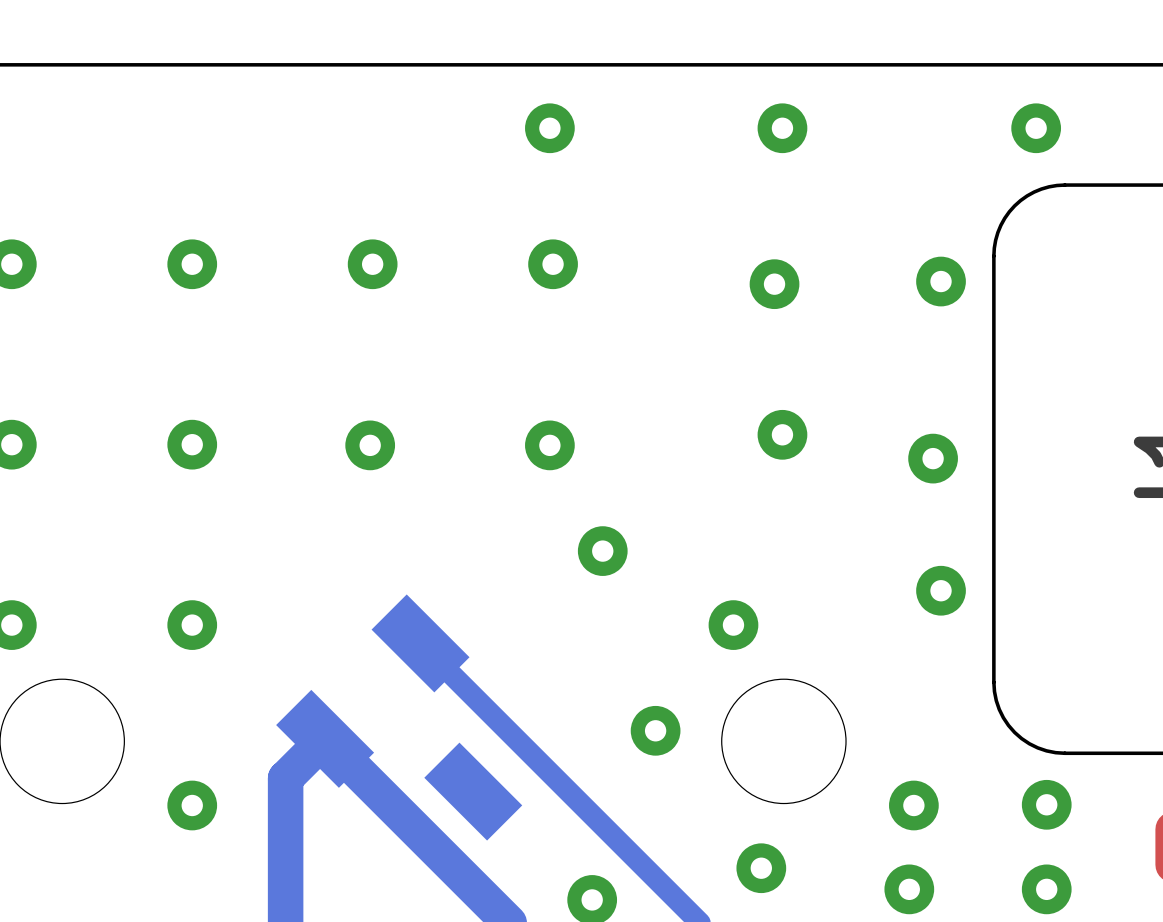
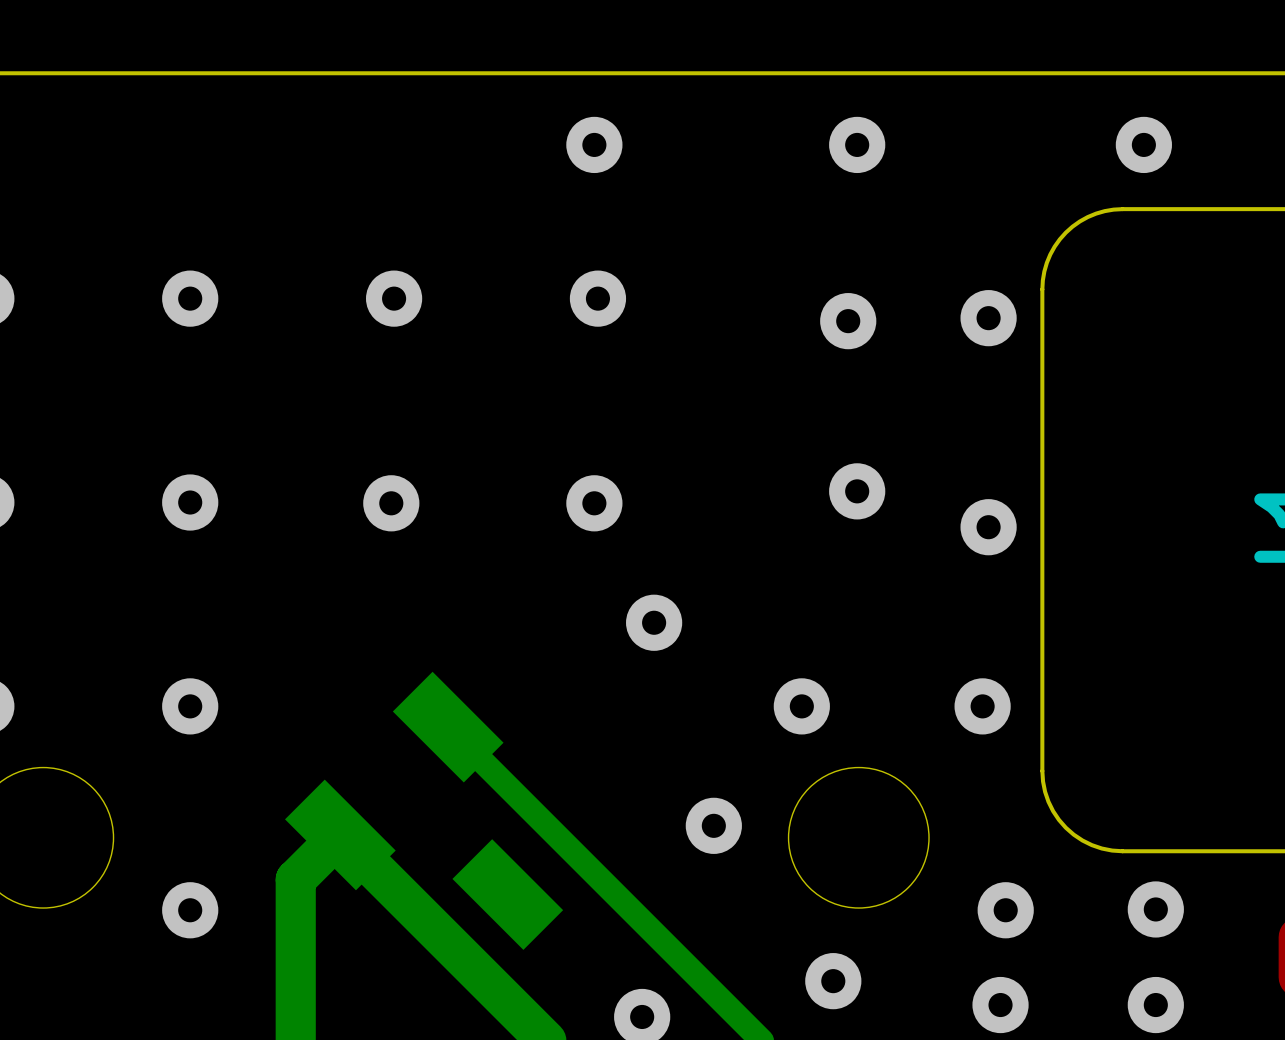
board edge: (1064, 185) (1049, 186) (1034, 192) (1014, 205) (1000, 225) (995, 240) (993, 256) (994, 691) (1003, 717) (1014, 732) (1037, 747) (1064, 753) -> (1176, 209) (1113, 209) (1096, 213) (1079, 221) (1065, 232) (1050, 254) (1044, 271) (1042, 289) (1042, 770) (1045, 791) (1053, 811) (1065, 827) (1091, 845) (1112, 850) (1176, 851)
via position: (941, 281) -> (988, 318)
via position: (933, 458) -> (988, 527)
via position: (941, 590) -> (982, 706)

